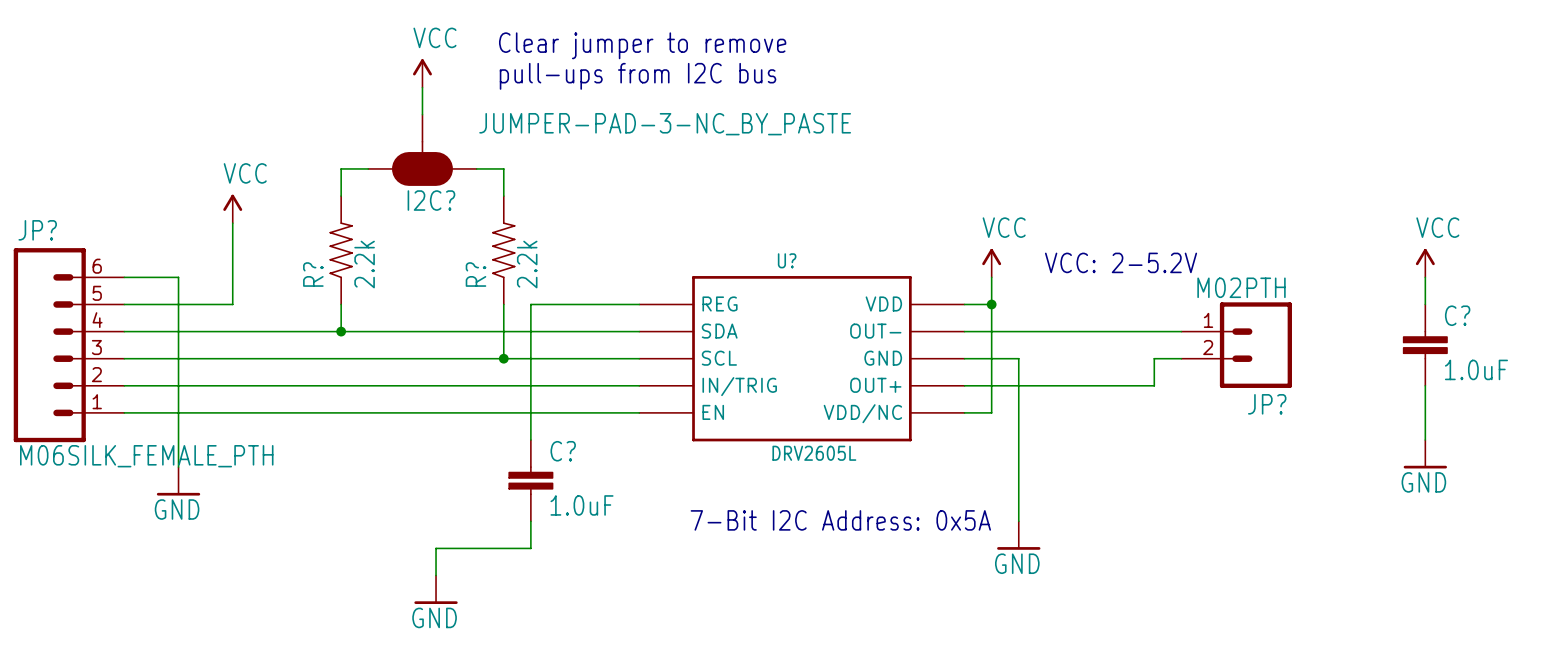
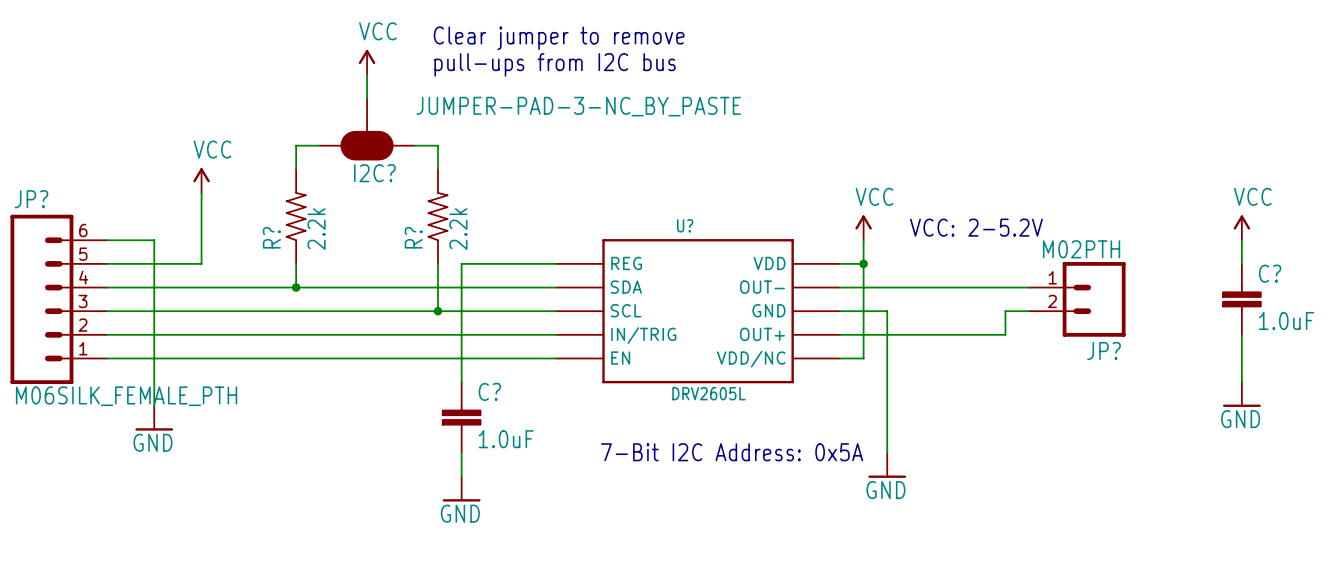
wire: (530, 548) (436, 548) (436, 575) -> none
power symbol position: GND (436, 589) -> GND (461, 489)

